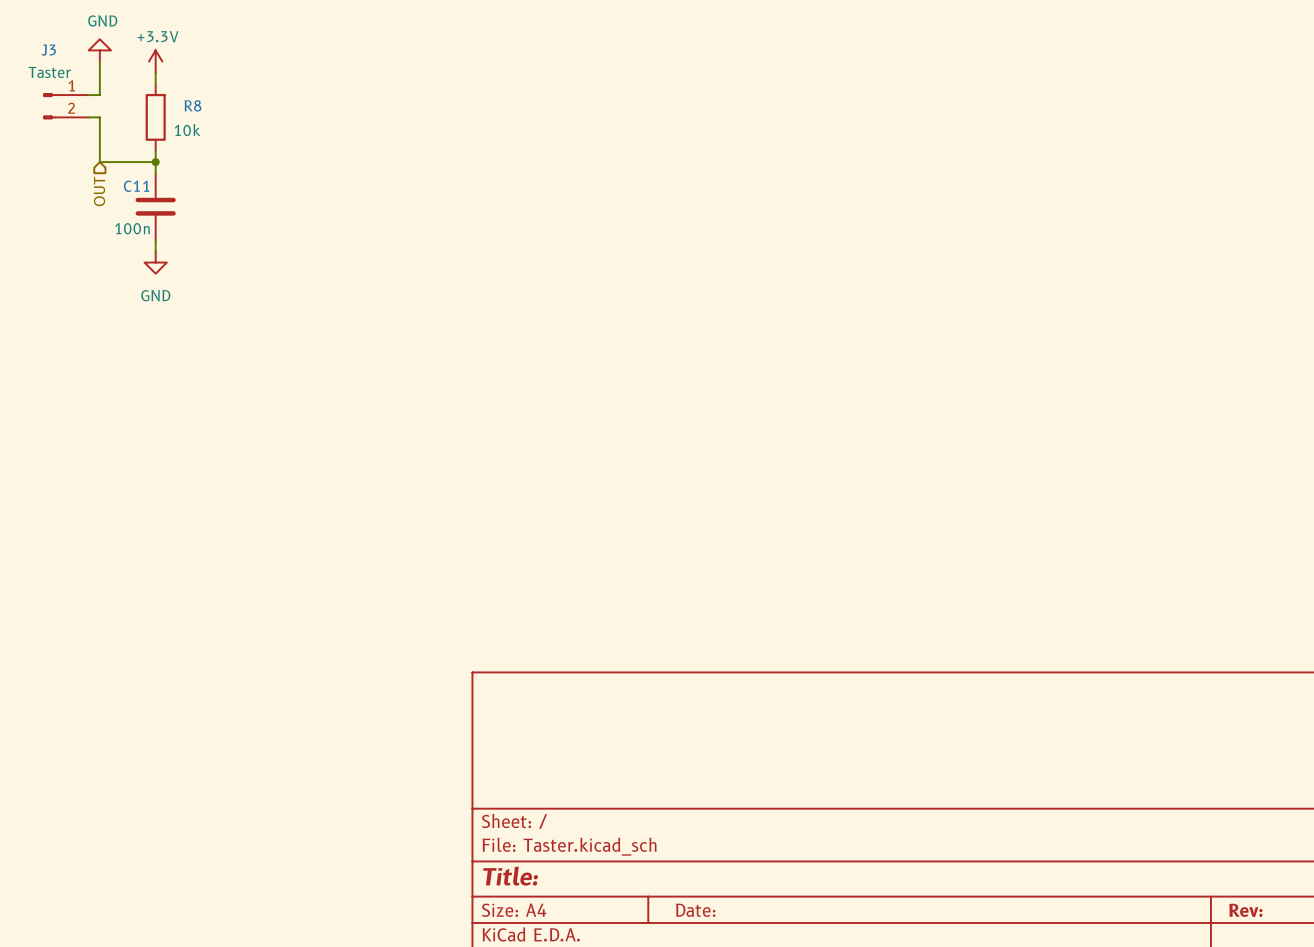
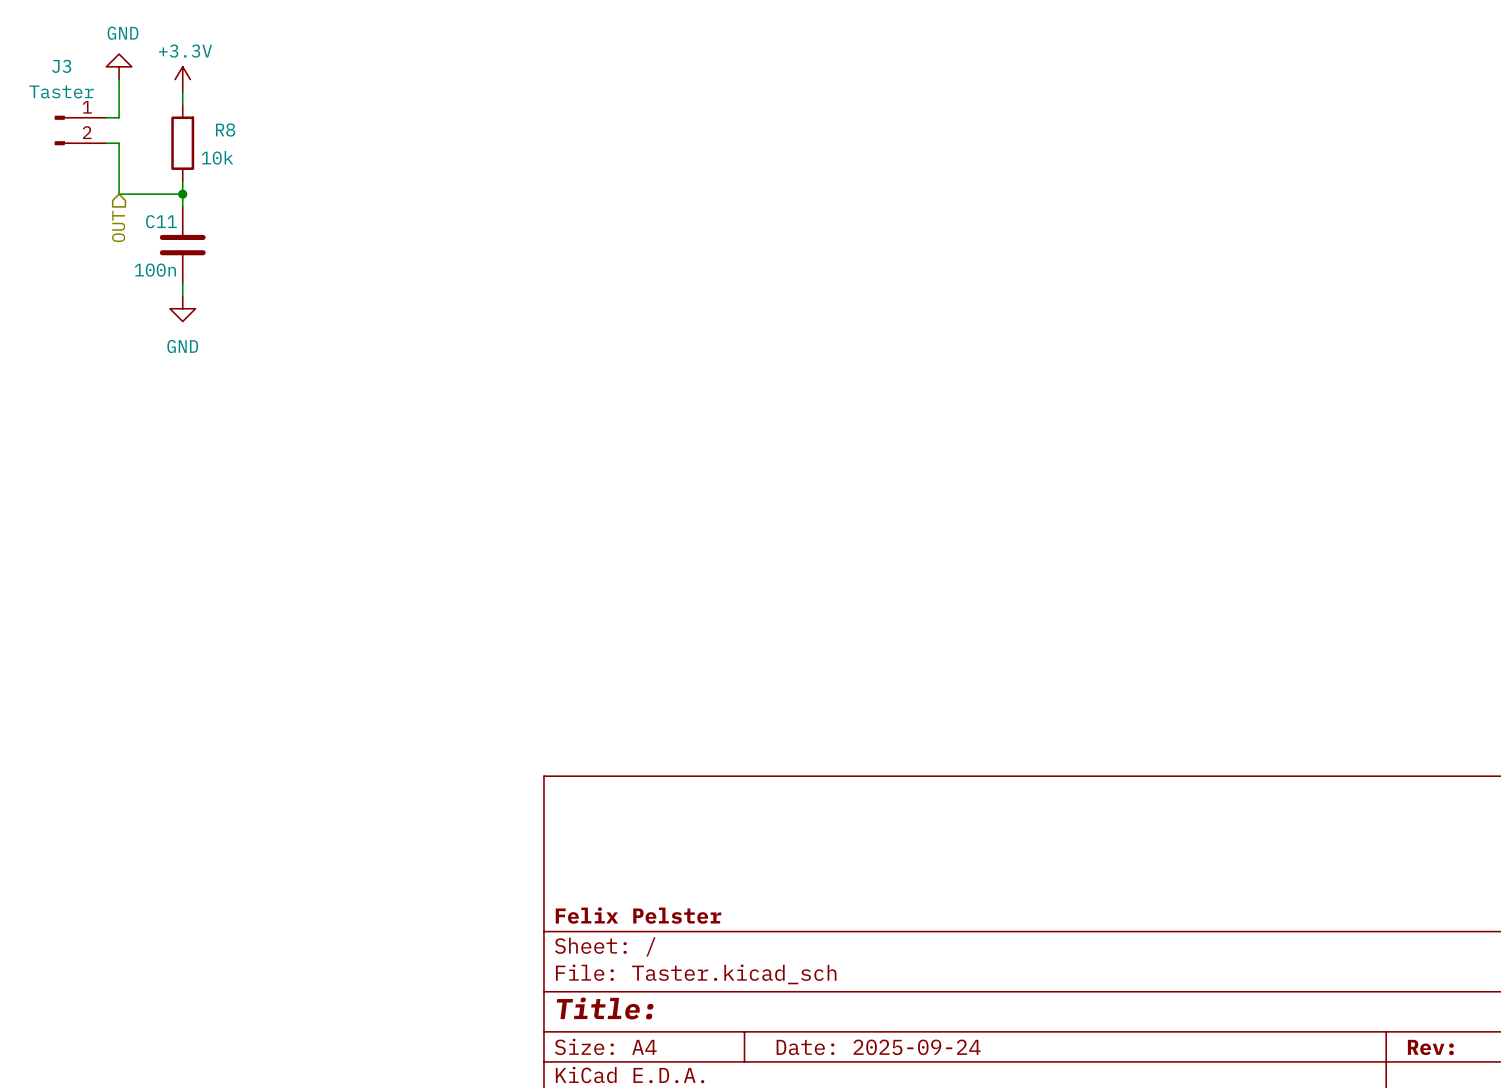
title block: none -> Felix Pelster (638, 915)
title block: Date: (695, 910) -> Date: 2025-09-24 (878, 1047)

